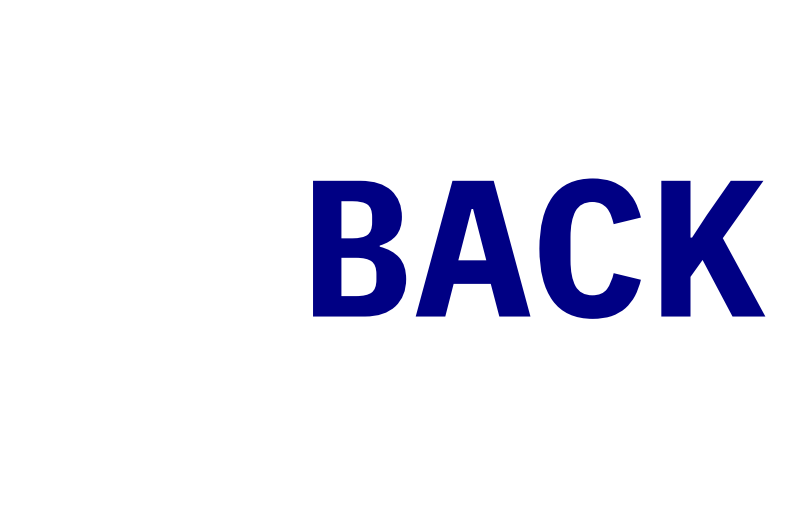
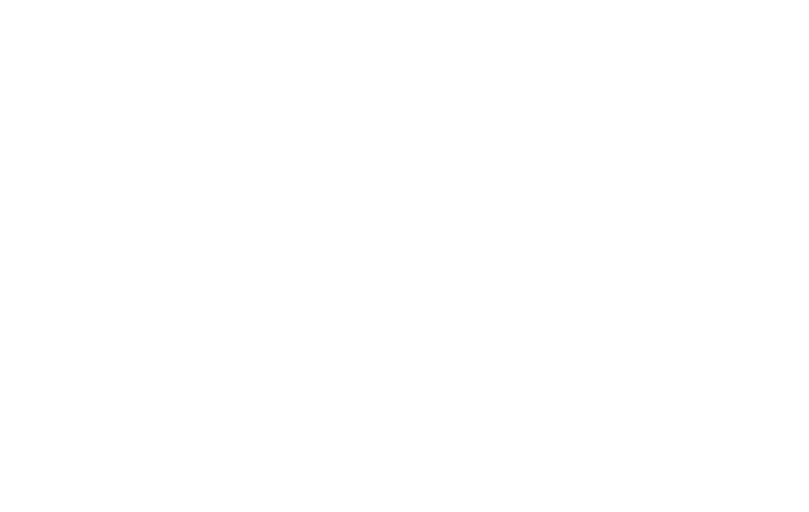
text: BACK (539, 248) -> none

